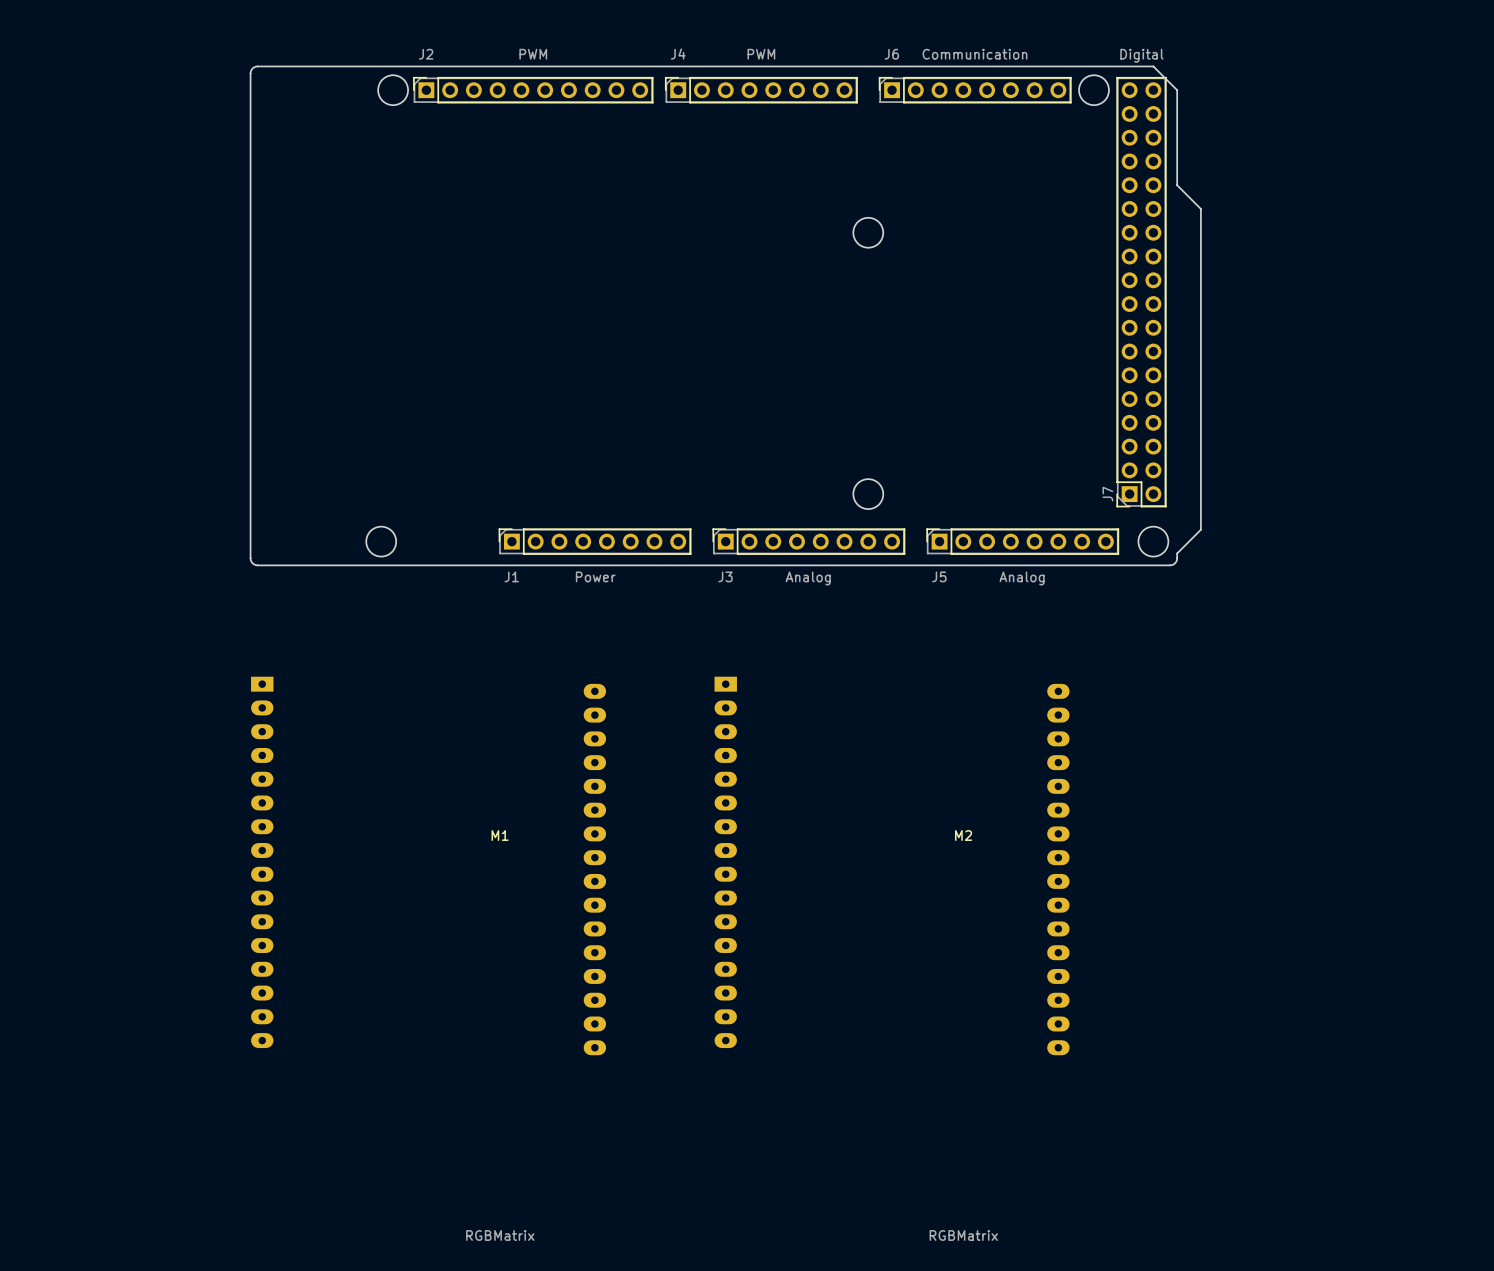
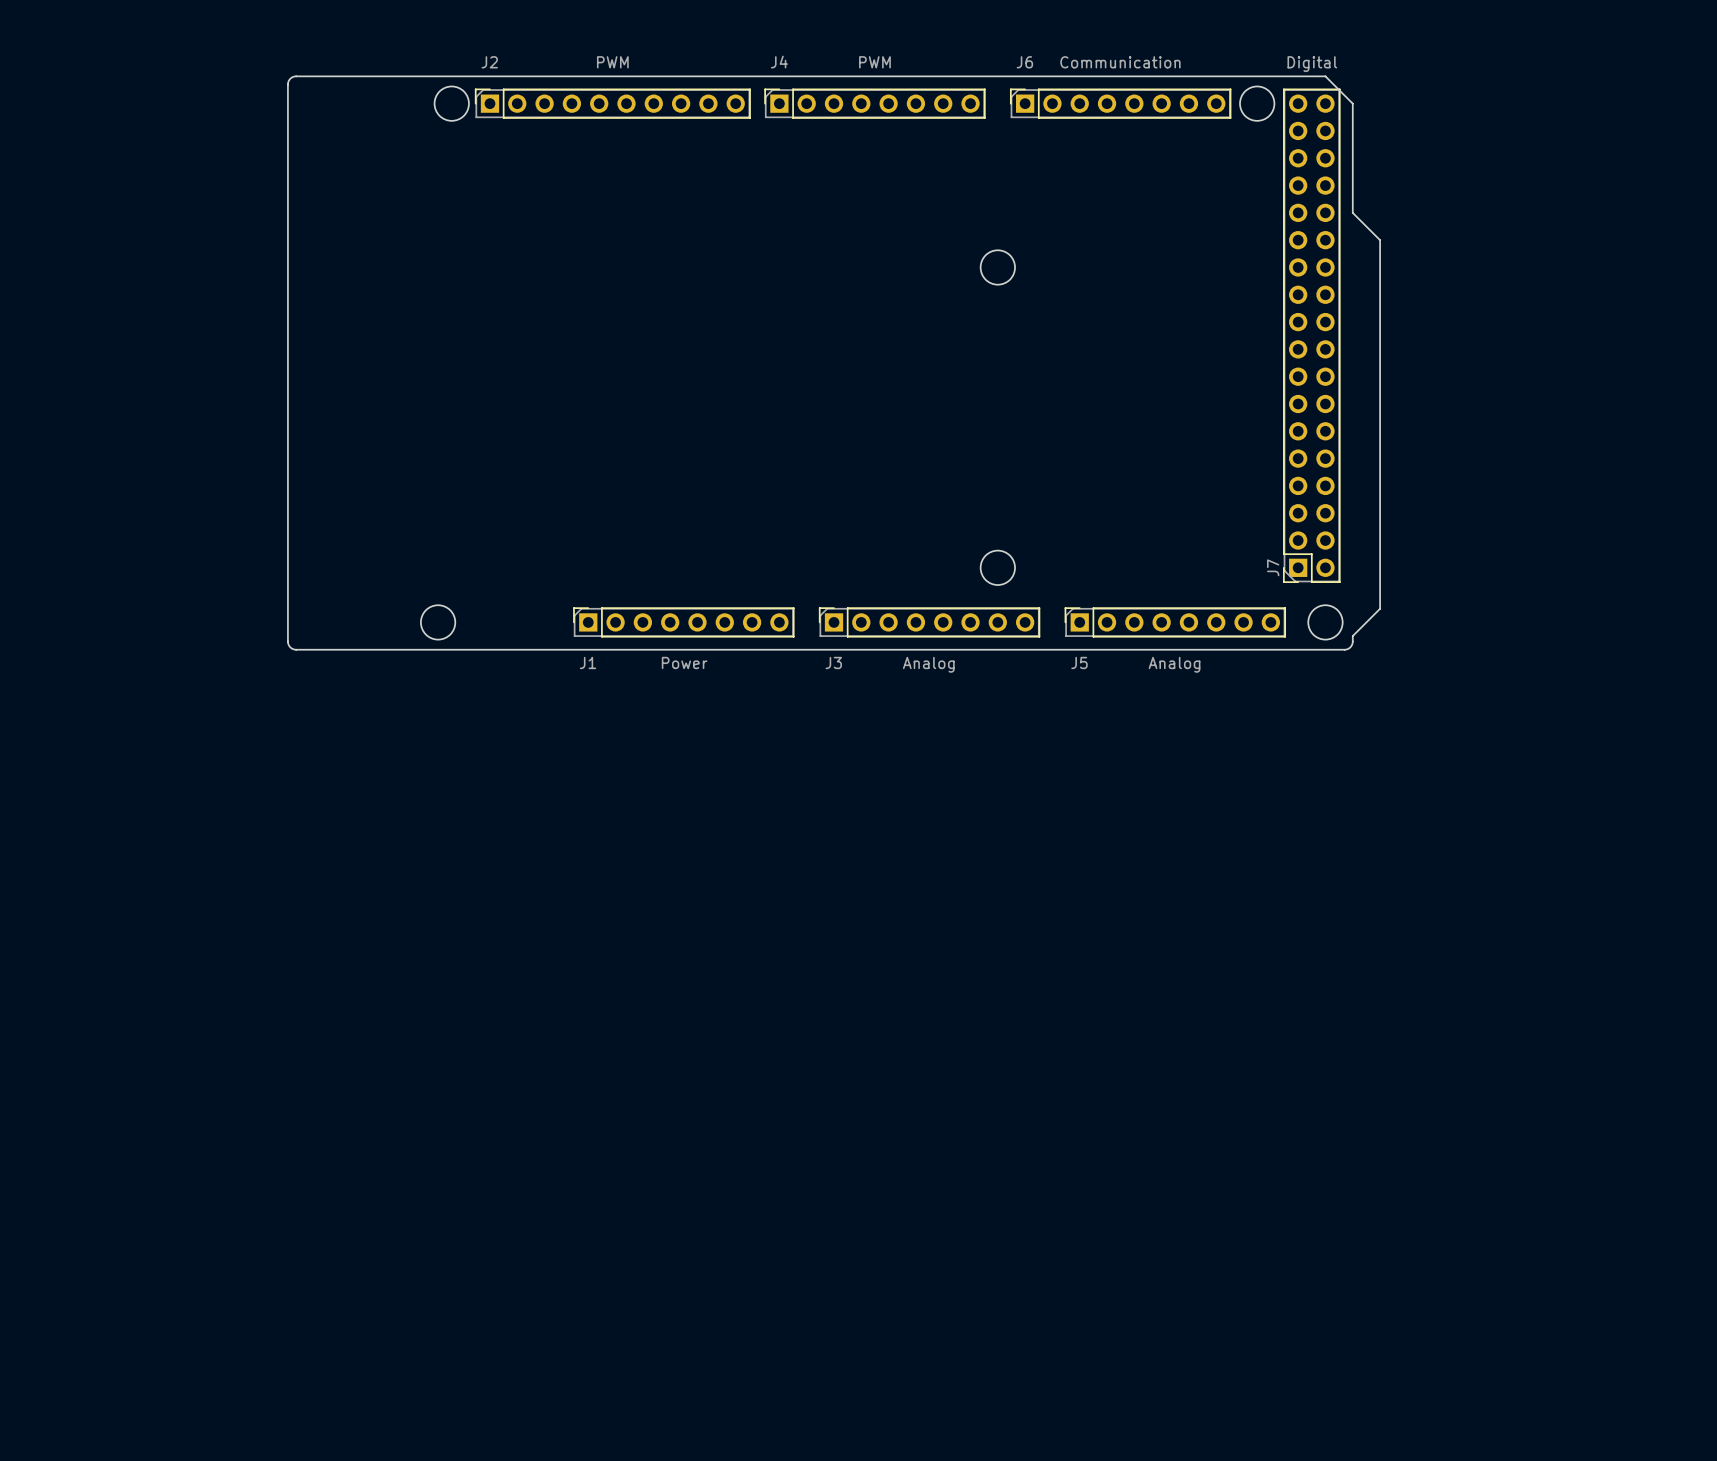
M1: RGBMatrix (428, 865) -> none
M2: RGBMatrix (892, 865) -> none

